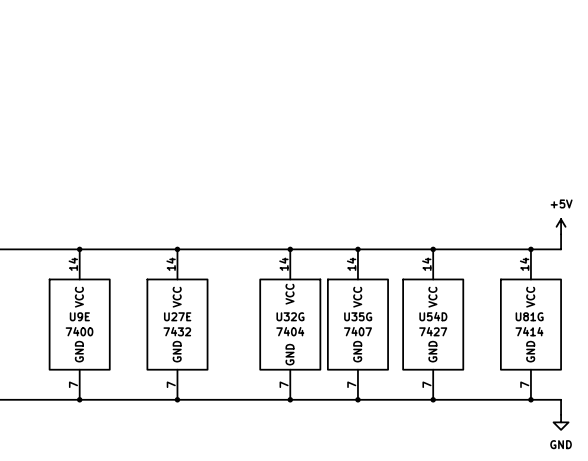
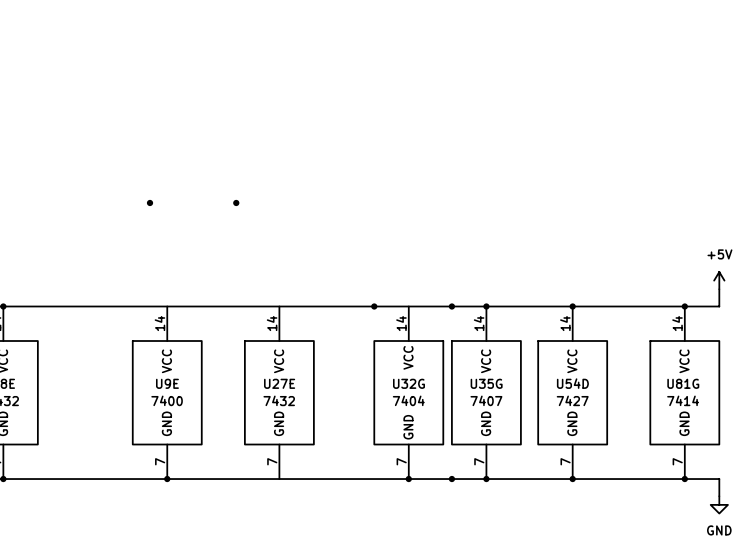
junction: none -> (150, 202)
junction: none -> (236, 202)
junction: (79, 249) -> none
junction: (177, 249) -> none
junction: none -> (374, 306)
junction: (290, 249) -> none
junction: none -> (451, 306)
junction: (177, 399) -> none
junction: none -> (451, 479)

